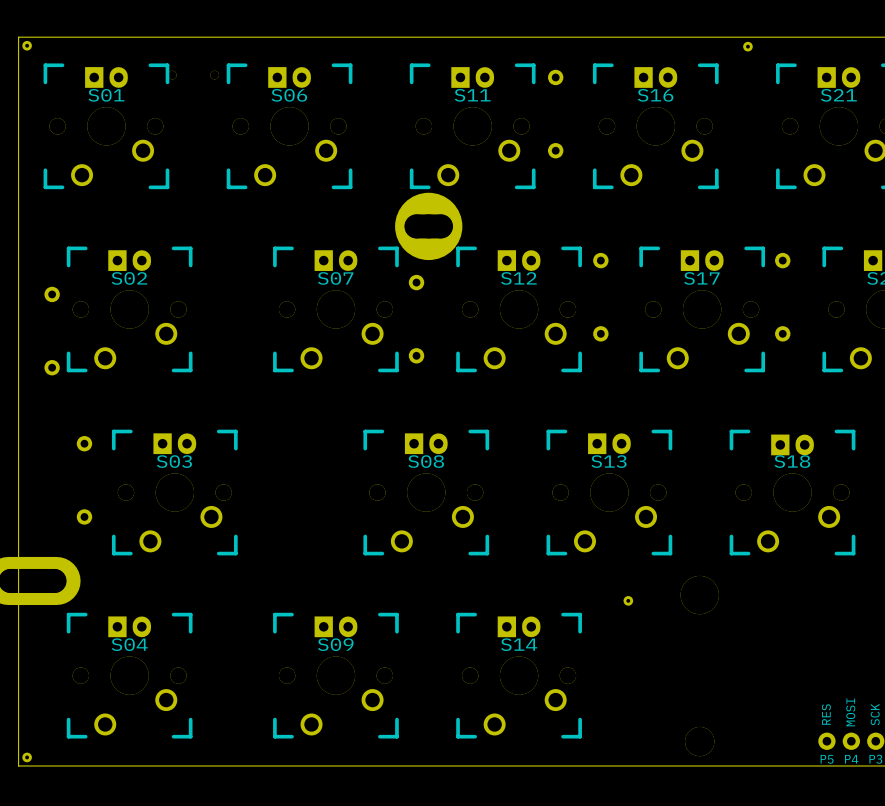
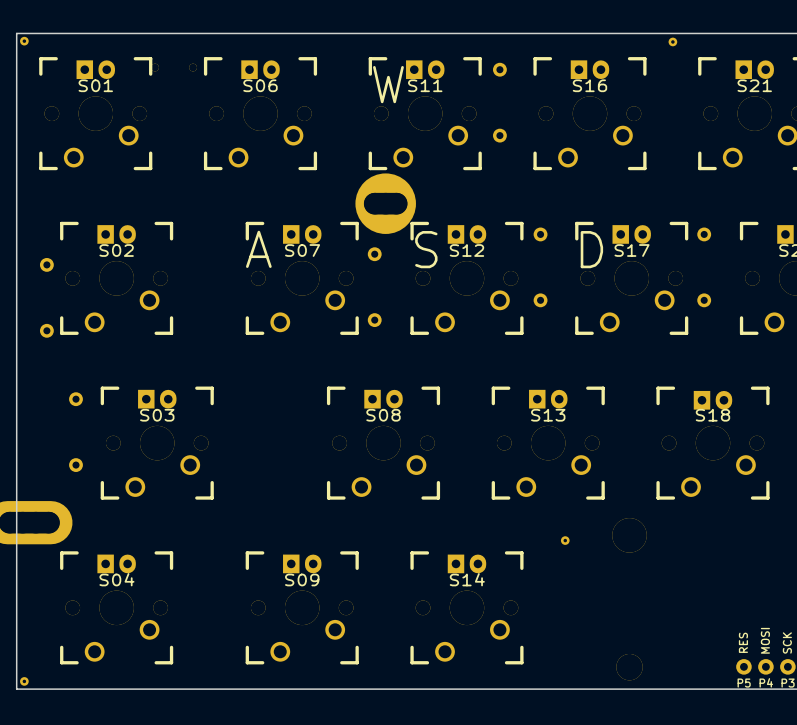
text: none -> W (388, 84)
text: none -> A (258, 249)
text: none -> S (426, 249)
text: none -> D (591, 249)

